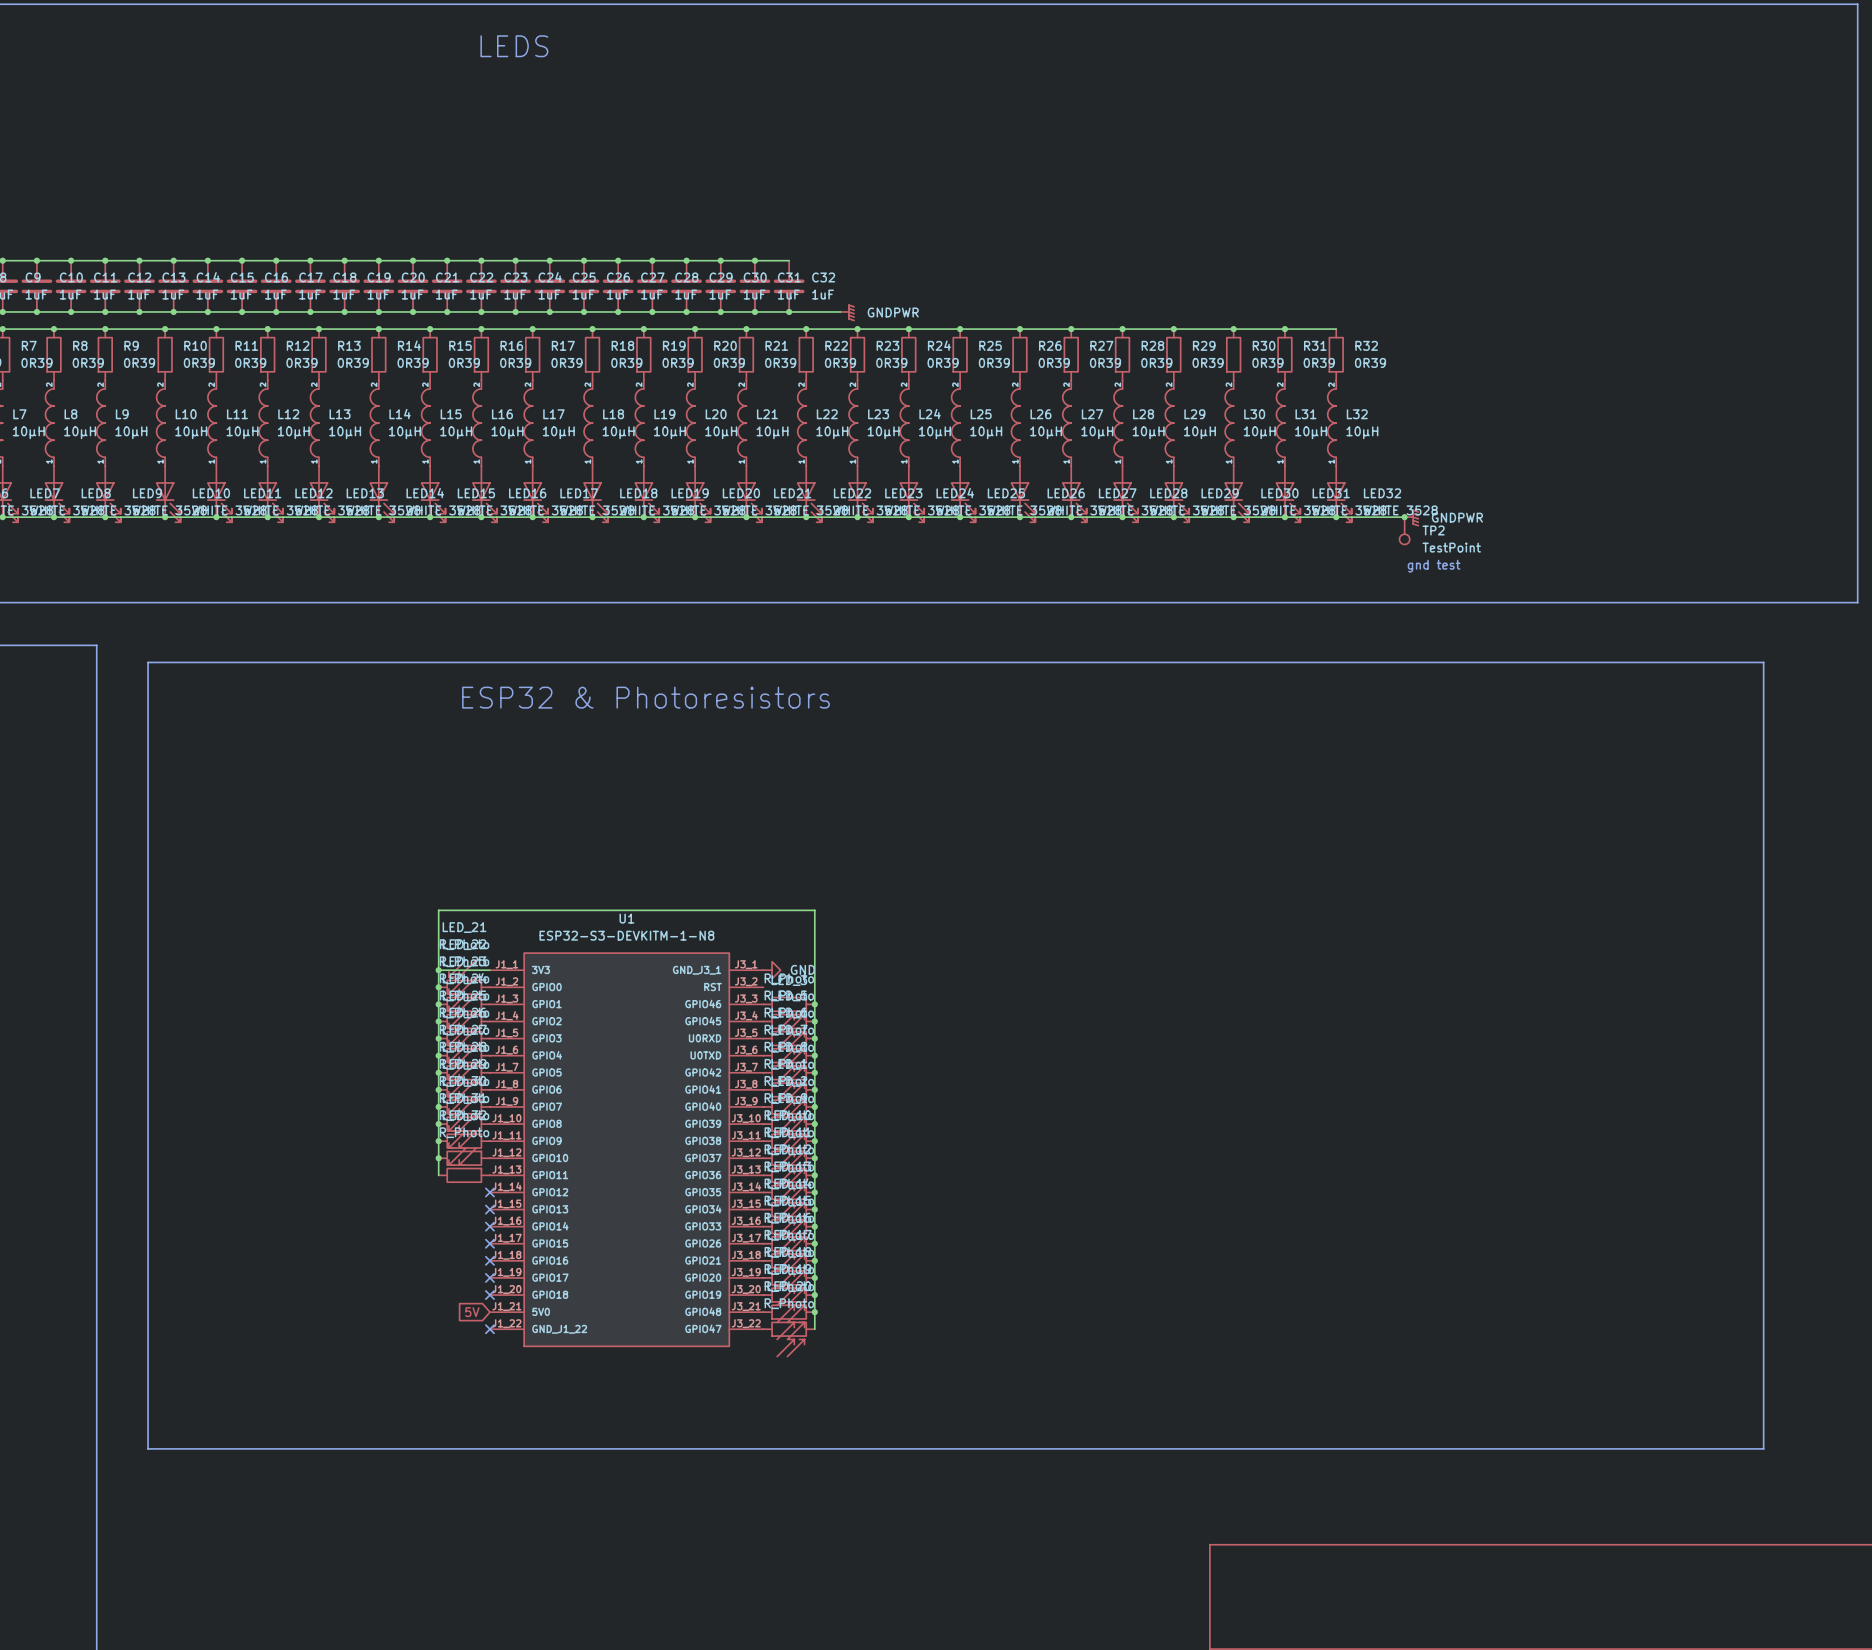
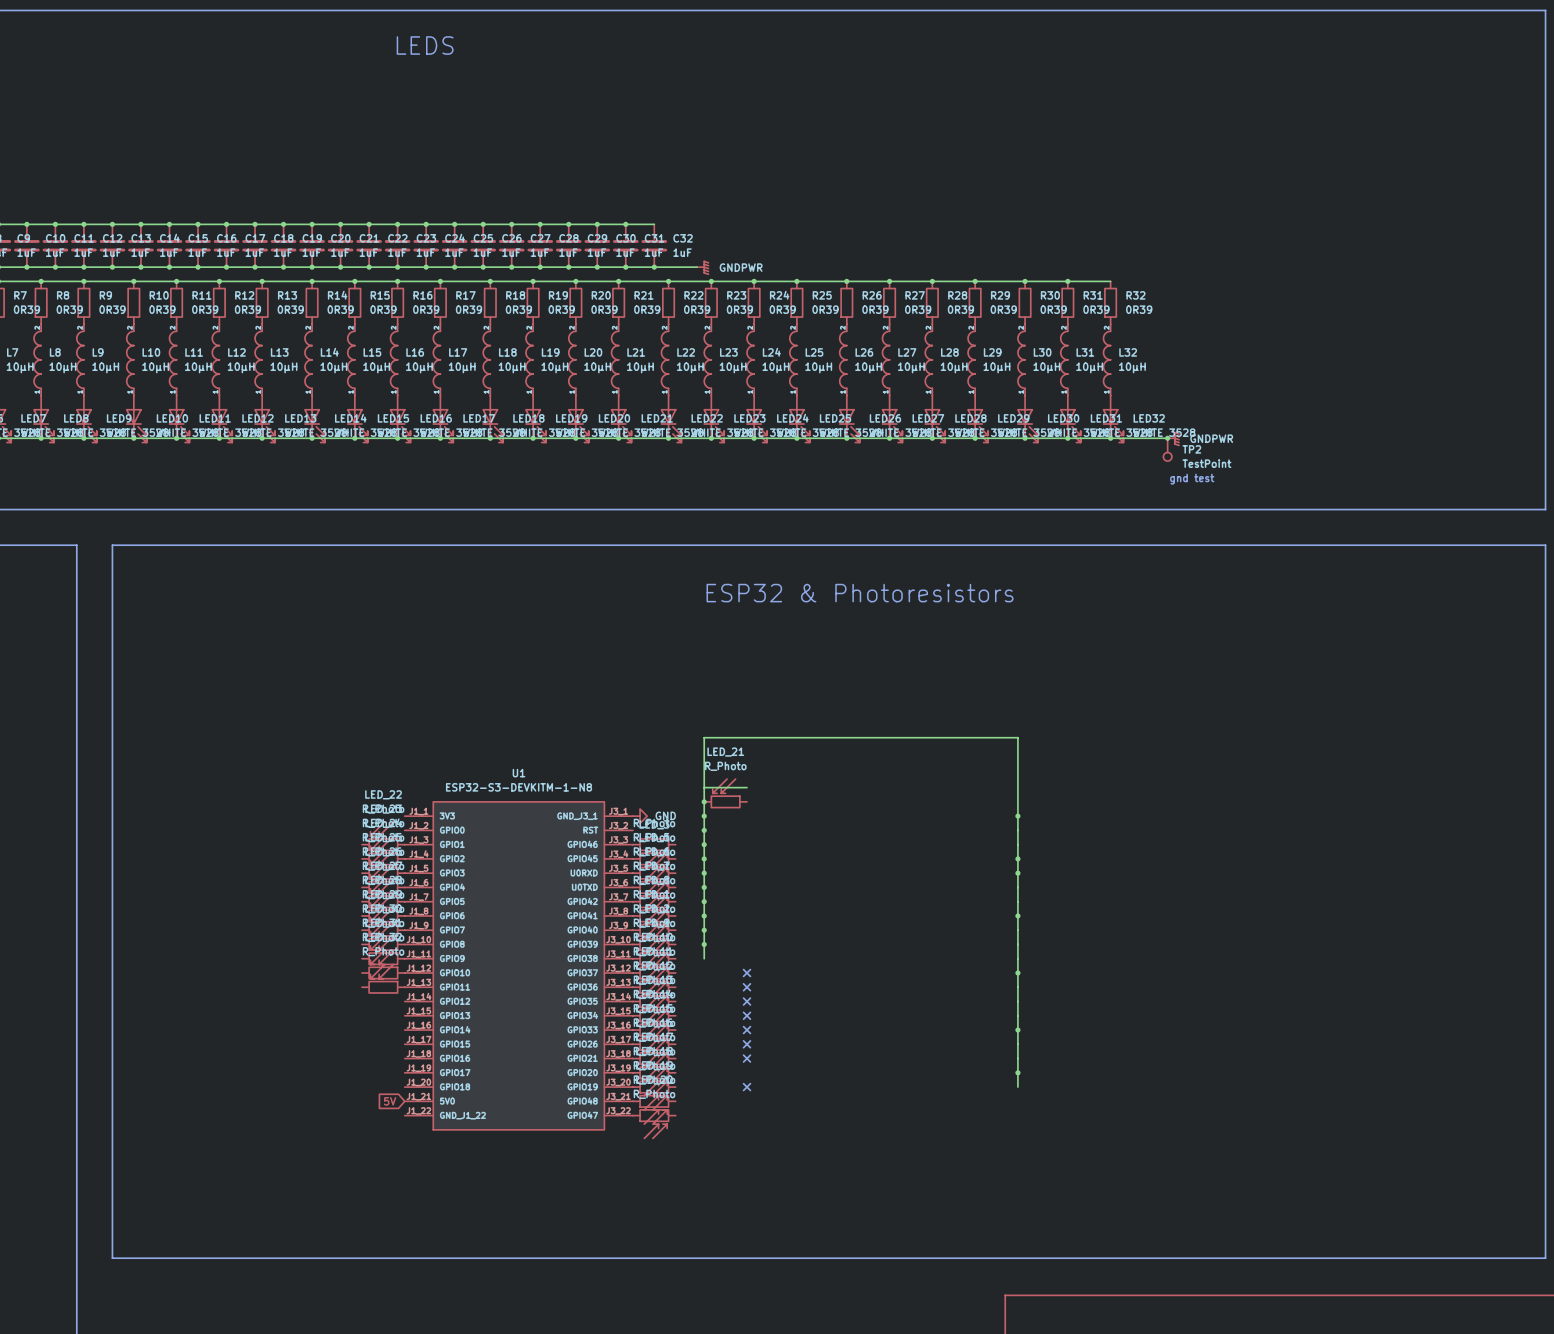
line: (148, 662) (1763, 662) (1763, 1448) (148, 1448) (148, 662) -> (112, 545) (112, 1258) (1545, 1258) (1545, 545) (112, 545)
text: ESP32 & Photoresistors (646, 697) -> none
text: none -> ESP32 & Photoresistors (860, 593)
wire: none -> (704, 787) (746, 787)
junction: none -> (704, 801)
wire: (438, 970) (489, 970) -> none
junction: (438, 970) -> none
junction: none -> (704, 816)
junction: none -> (1017, 816)
LED_21 position: (464, 977) -> (725, 793)
junction: (438, 987) -> none
junction: none -> (704, 830)
junction: (438, 1004) -> none
junction: (814, 1004) -> none
junction: none -> (704, 844)
junction: (438, 1021) -> none
junction: (814, 1021) -> none
junction: none -> (704, 858)
junction: none -> (1017, 858)
junction: (438, 1038) -> none
junction: (814, 1038) -> none
junction: none -> (704, 873)
junction: none -> (1017, 873)
junction: (438, 1055) -> none
junction: (814, 1055) -> none
junction: none -> (704, 887)
junction: (438, 1072) -> none
junction: (814, 1072) -> none
junction: none -> (704, 901)
junction: (438, 1089) -> none
junction: (814, 1089) -> none
junction: none -> (704, 915)
junction: none -> (1017, 915)
junction: (438, 1106) -> none
junction: (814, 1106) -> none
junction: none -> (704, 930)
junction: (438, 1124) -> none
junction: (814, 1124) -> none
junction: none -> (704, 944)
junction: (438, 1141) -> none
junction: (814, 1141) -> none
wire: none -> (704, 958) (704, 737) (1017, 737) (1017, 1087)
junction: (438, 1158) -> none
junction: (814, 1158) -> none
no-connect mark: none -> (746, 973)
junction: none -> (1017, 973)
wire: (438, 1175) (438, 910) (814, 910) (814, 1329) -> none
junction: (814, 1175) -> none
no-connect mark: none -> (746, 987)
no-connect mark: (489, 1192) -> none
junction: (814, 1192) -> none
no-connect mark: none -> (746, 1001)
no-connect mark: (489, 1209) -> none
junction: (814, 1209) -> none
no-connect mark: none -> (746, 1015)
no-connect mark: (489, 1226) -> none
junction: (814, 1226) -> none
no-connect mark: none -> (746, 1030)
junction: none -> (1017, 1030)
no-connect mark: (489, 1243) -> none
junction: (814, 1243) -> none
no-connect mark: none -> (746, 1044)
no-connect mark: (489, 1260) -> none
junction: (814, 1260) -> none
no-connect mark: none -> (746, 1058)
no-connect mark: (489, 1277) -> none
junction: (814, 1277) -> none
junction: none -> (1017, 1072)
no-connect mark: (489, 1295) -> none
junction: (814, 1295) -> none
no-connect mark: none -> (746, 1087)
junction: (814, 1312) -> none
no-connect mark: (489, 1329) -> none

